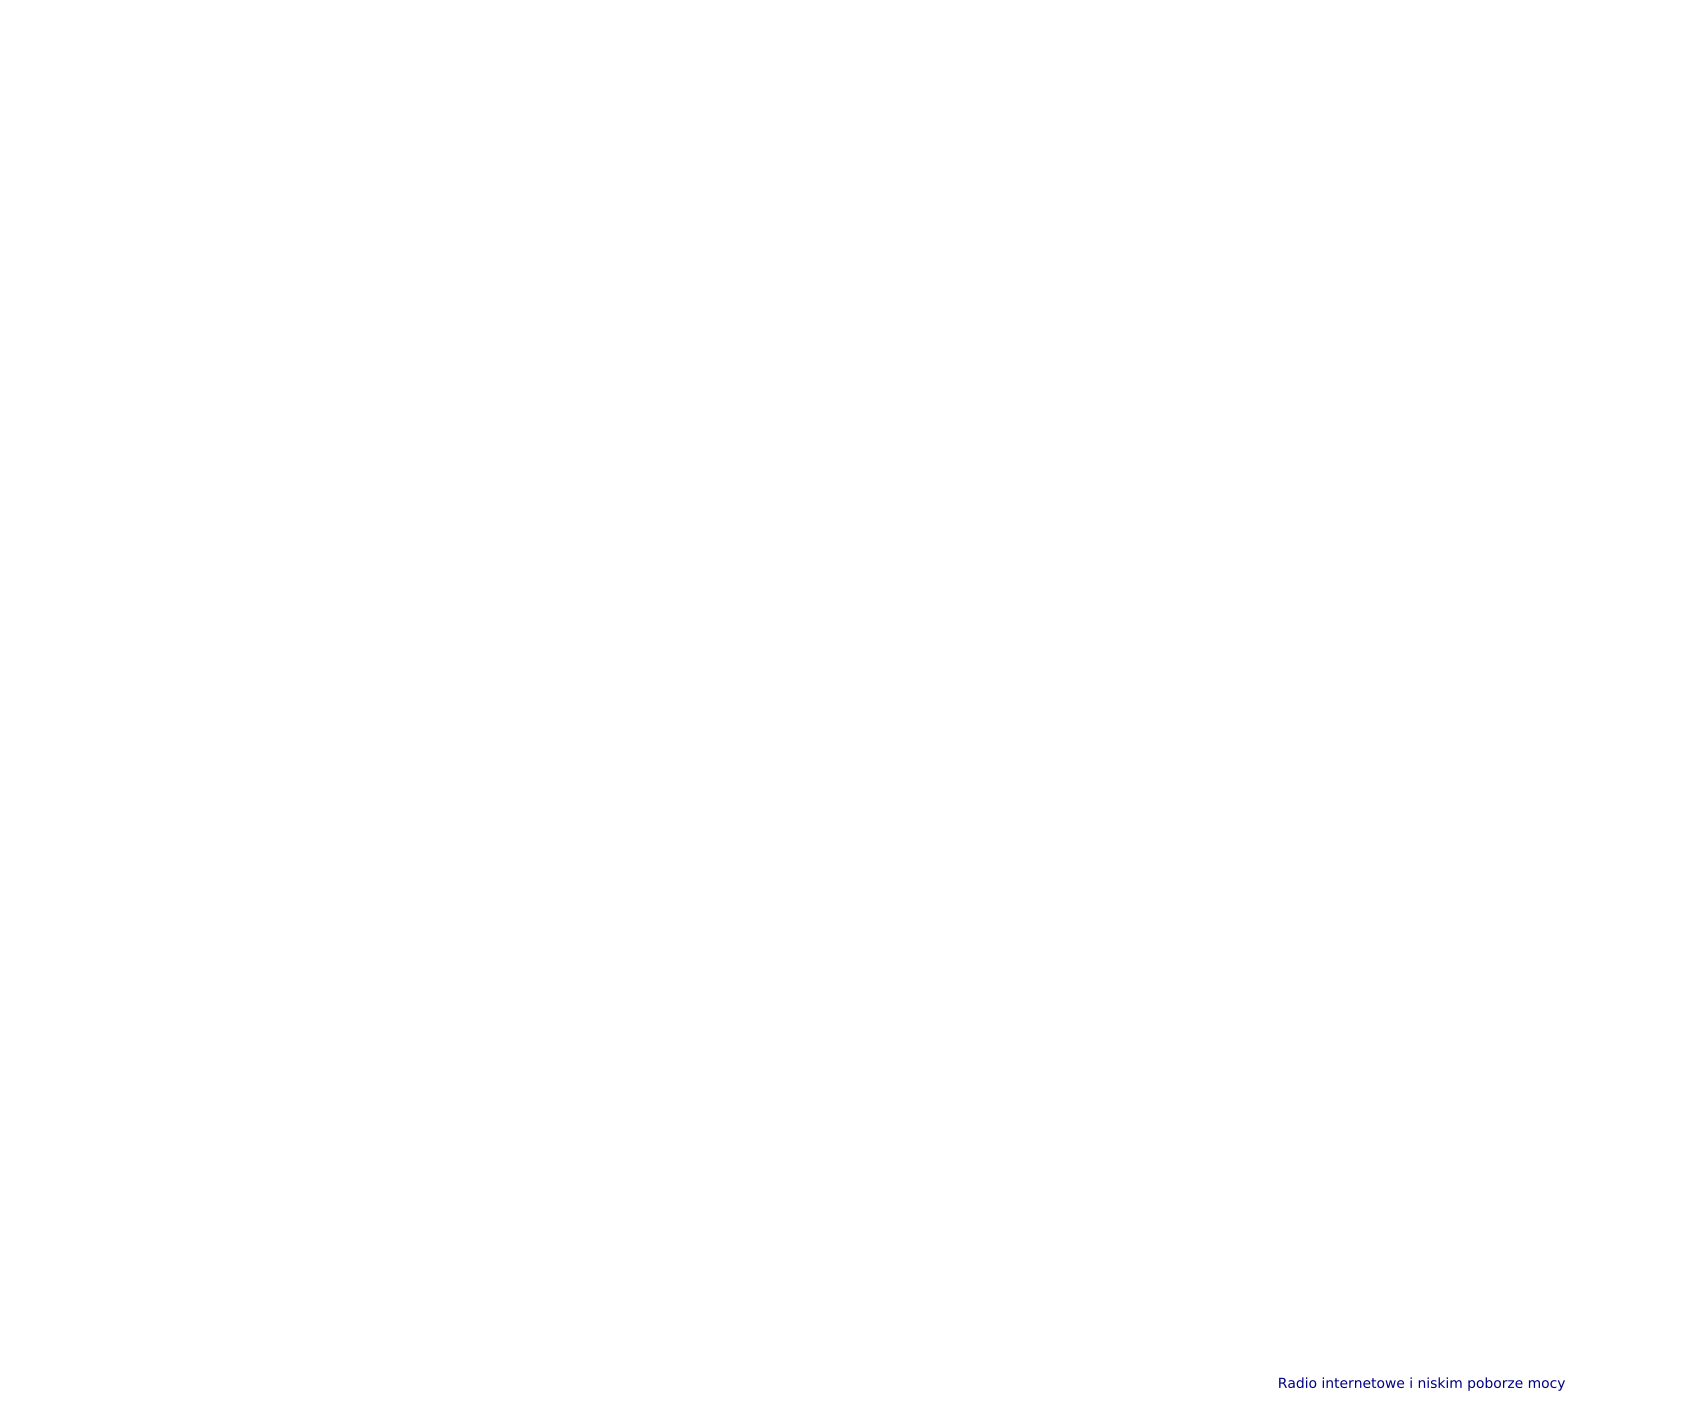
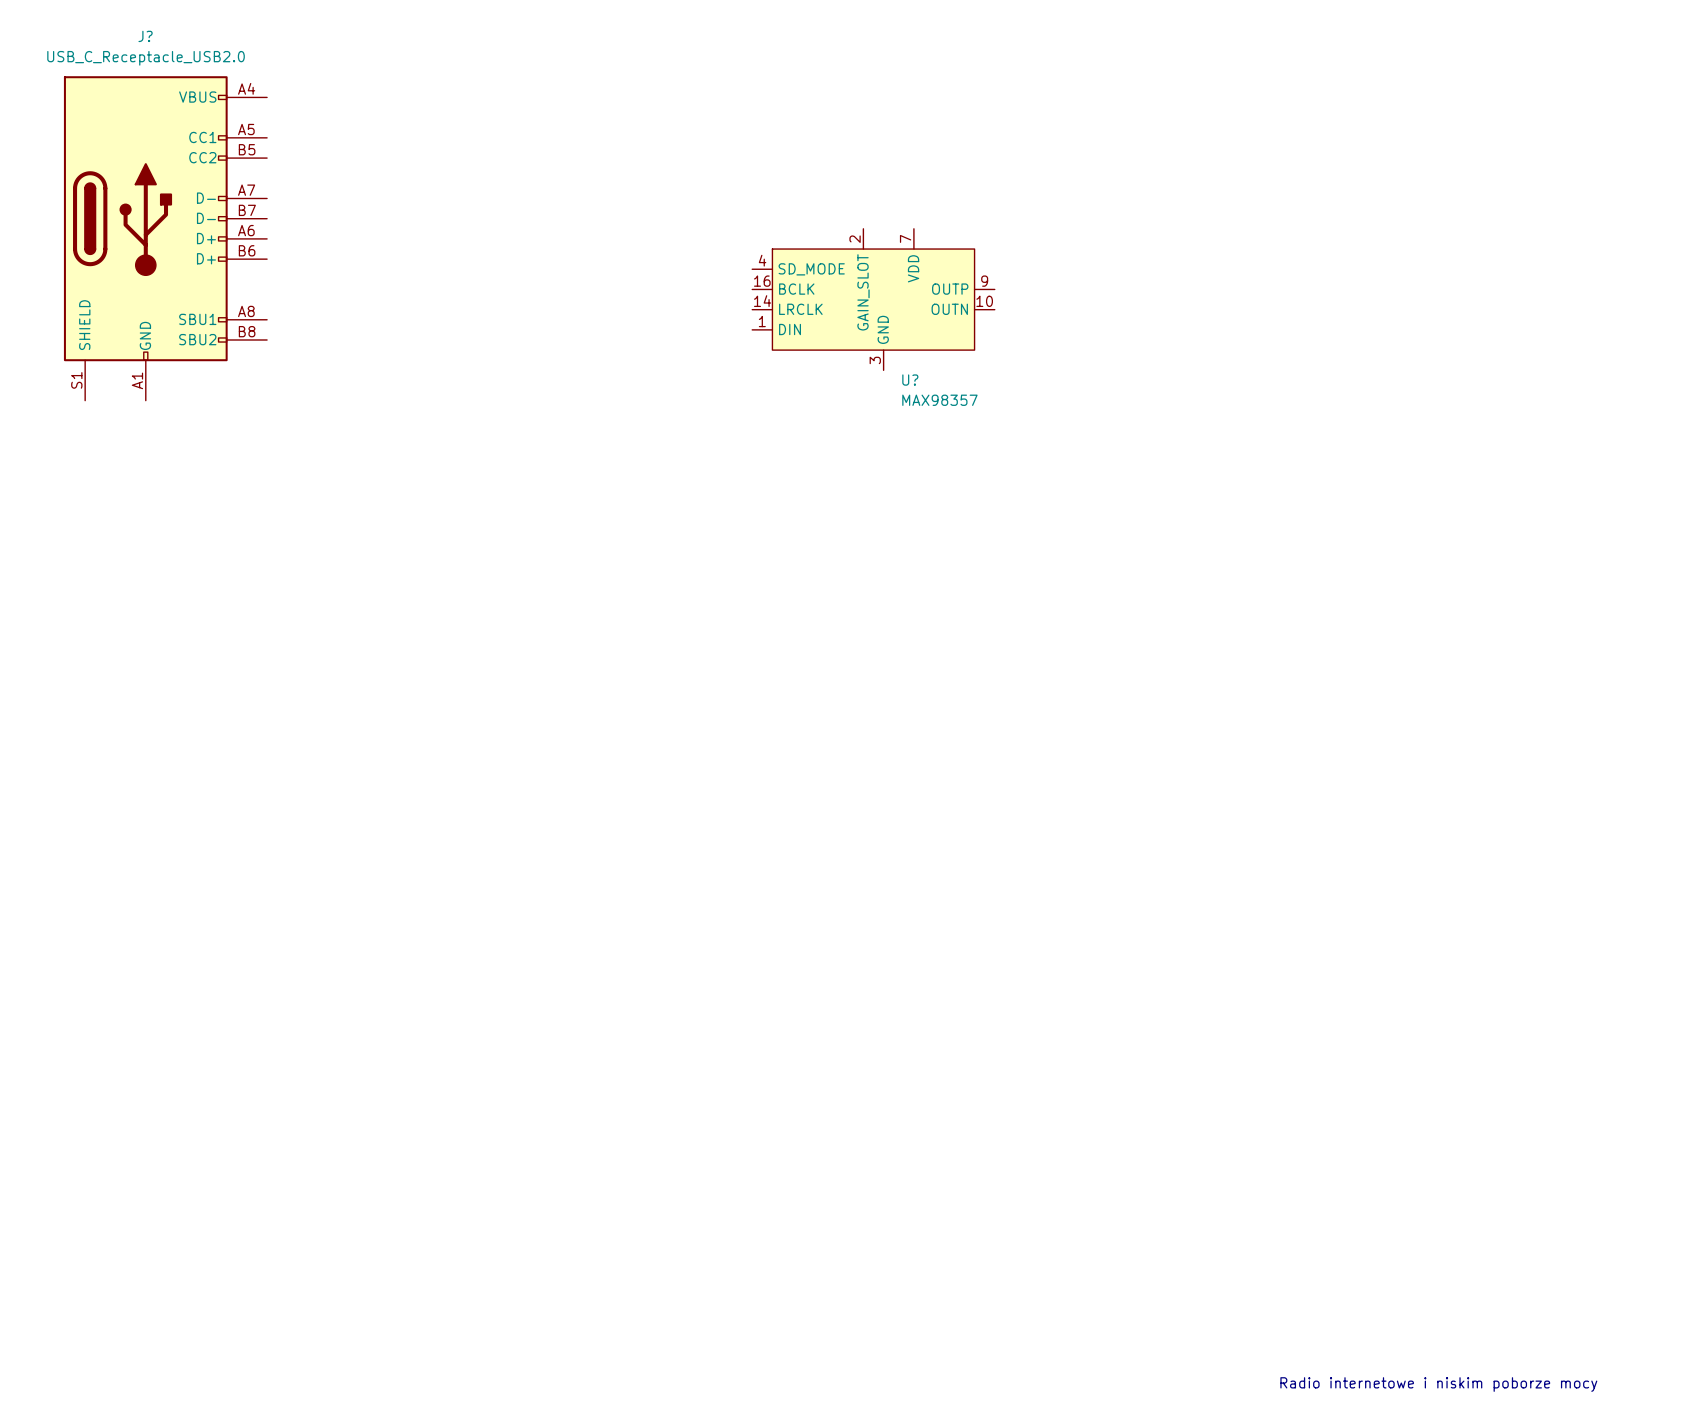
J?: none -> USB_C_Receptacle_USB2.0 (165, 238)
U?: none -> MAX98357 (873, 299)

